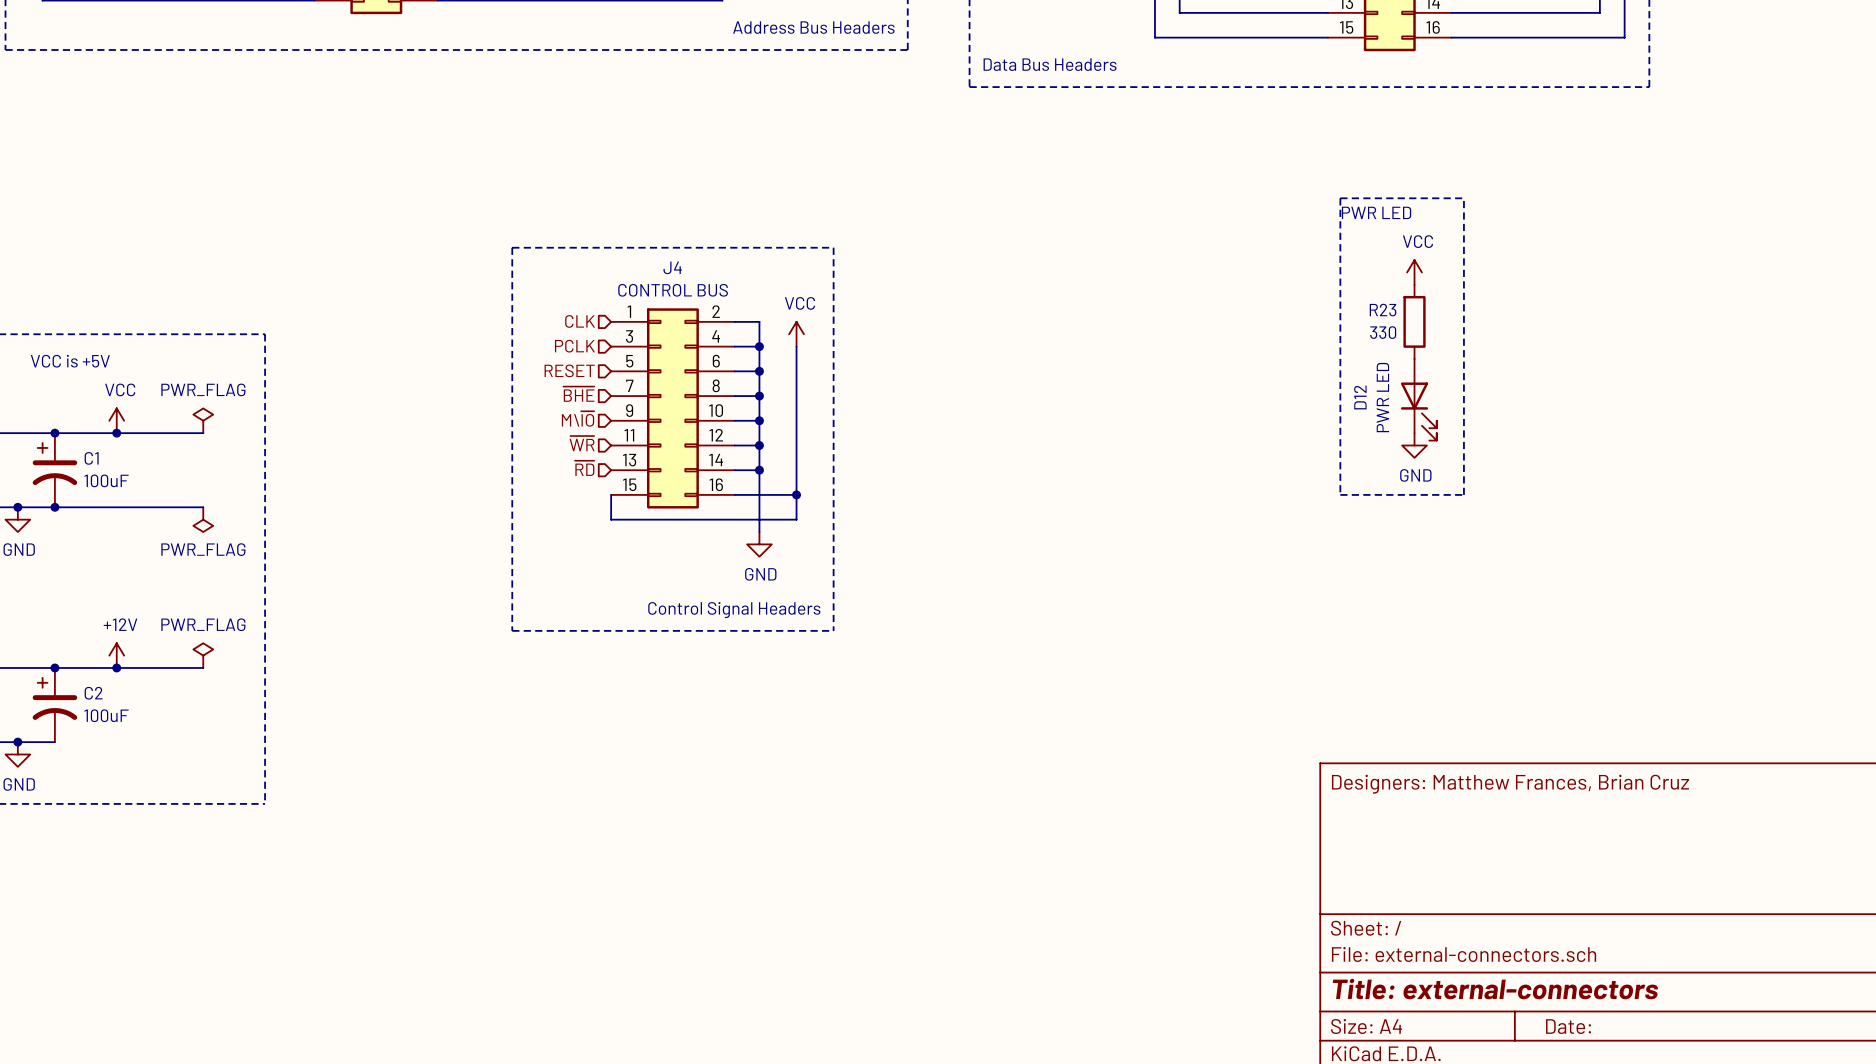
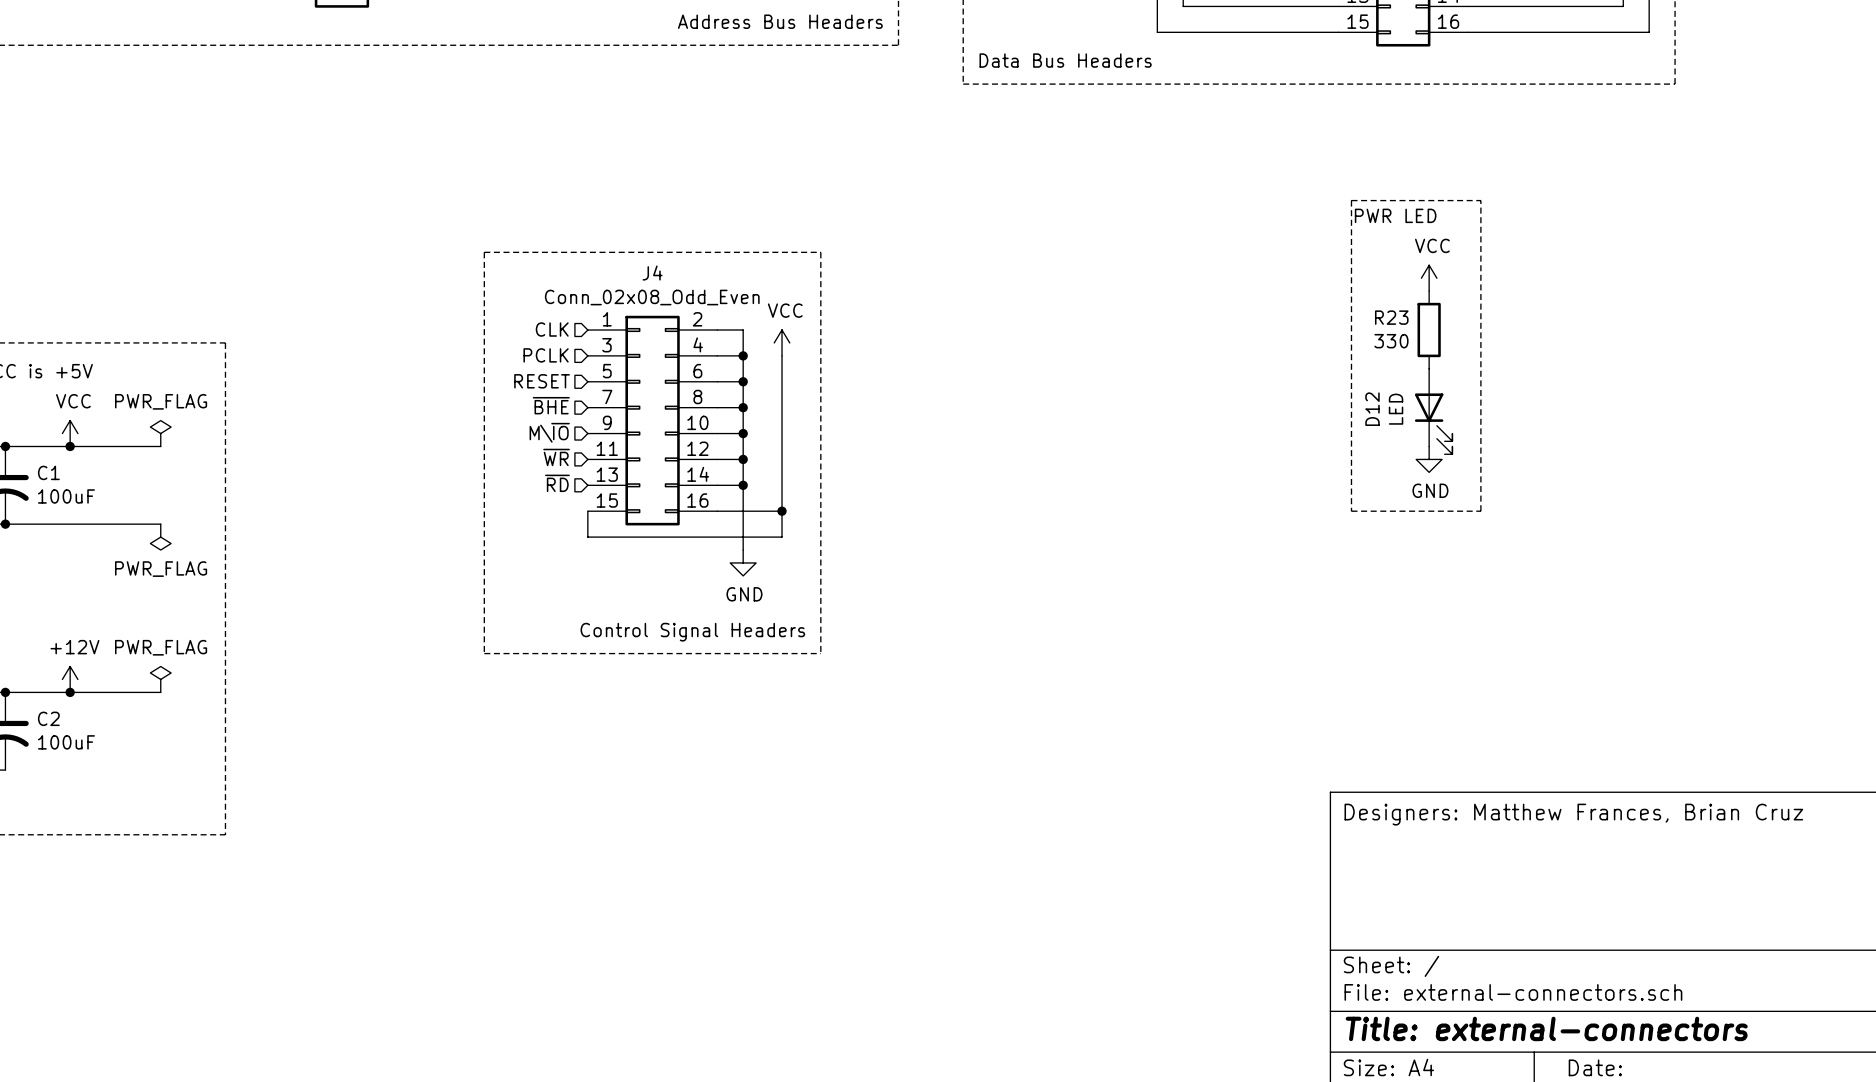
J4 value: CONTROL BUS (673, 290) -> Conn_02x08_Odd_Even (652, 297)
D12 value: PWR LED (1382, 397) -> LED (1396, 409)

